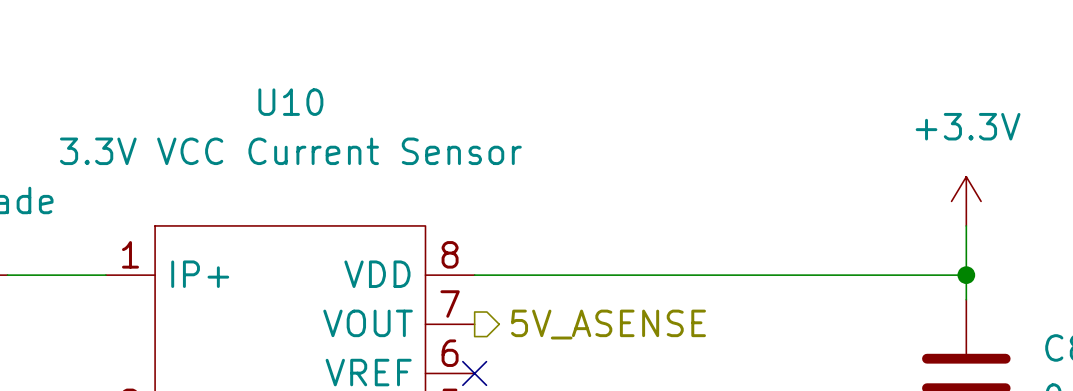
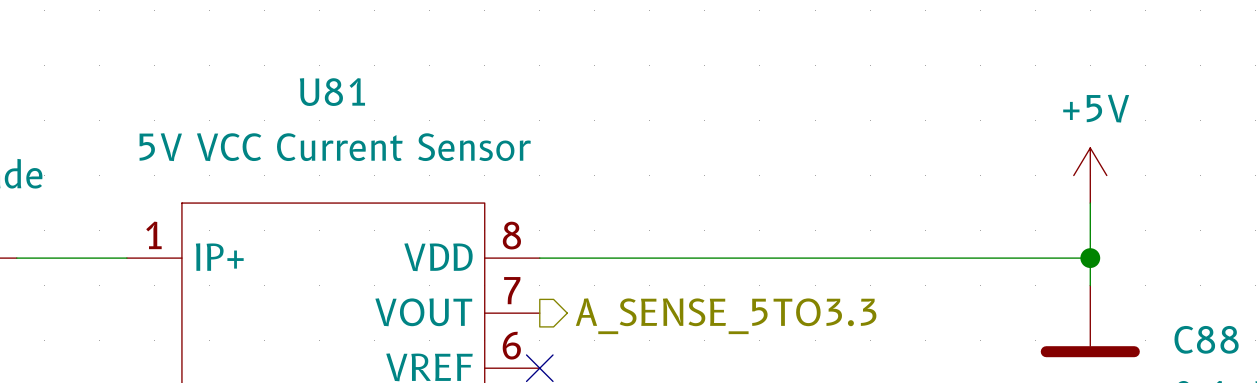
U10 name: U10 (290, 102) -> U81 (332, 92)
U10 value: 3.3V VCC Current Sensor (290, 151) -> 5V VCC Current Sensor (335, 147)
power symbol: +3.3V (966, 201) -> +5V (1090, 175)
hierarchical label: 5V_ASENSE (608, 324) -> A_SENSE_5TO3.3 (726, 316)

